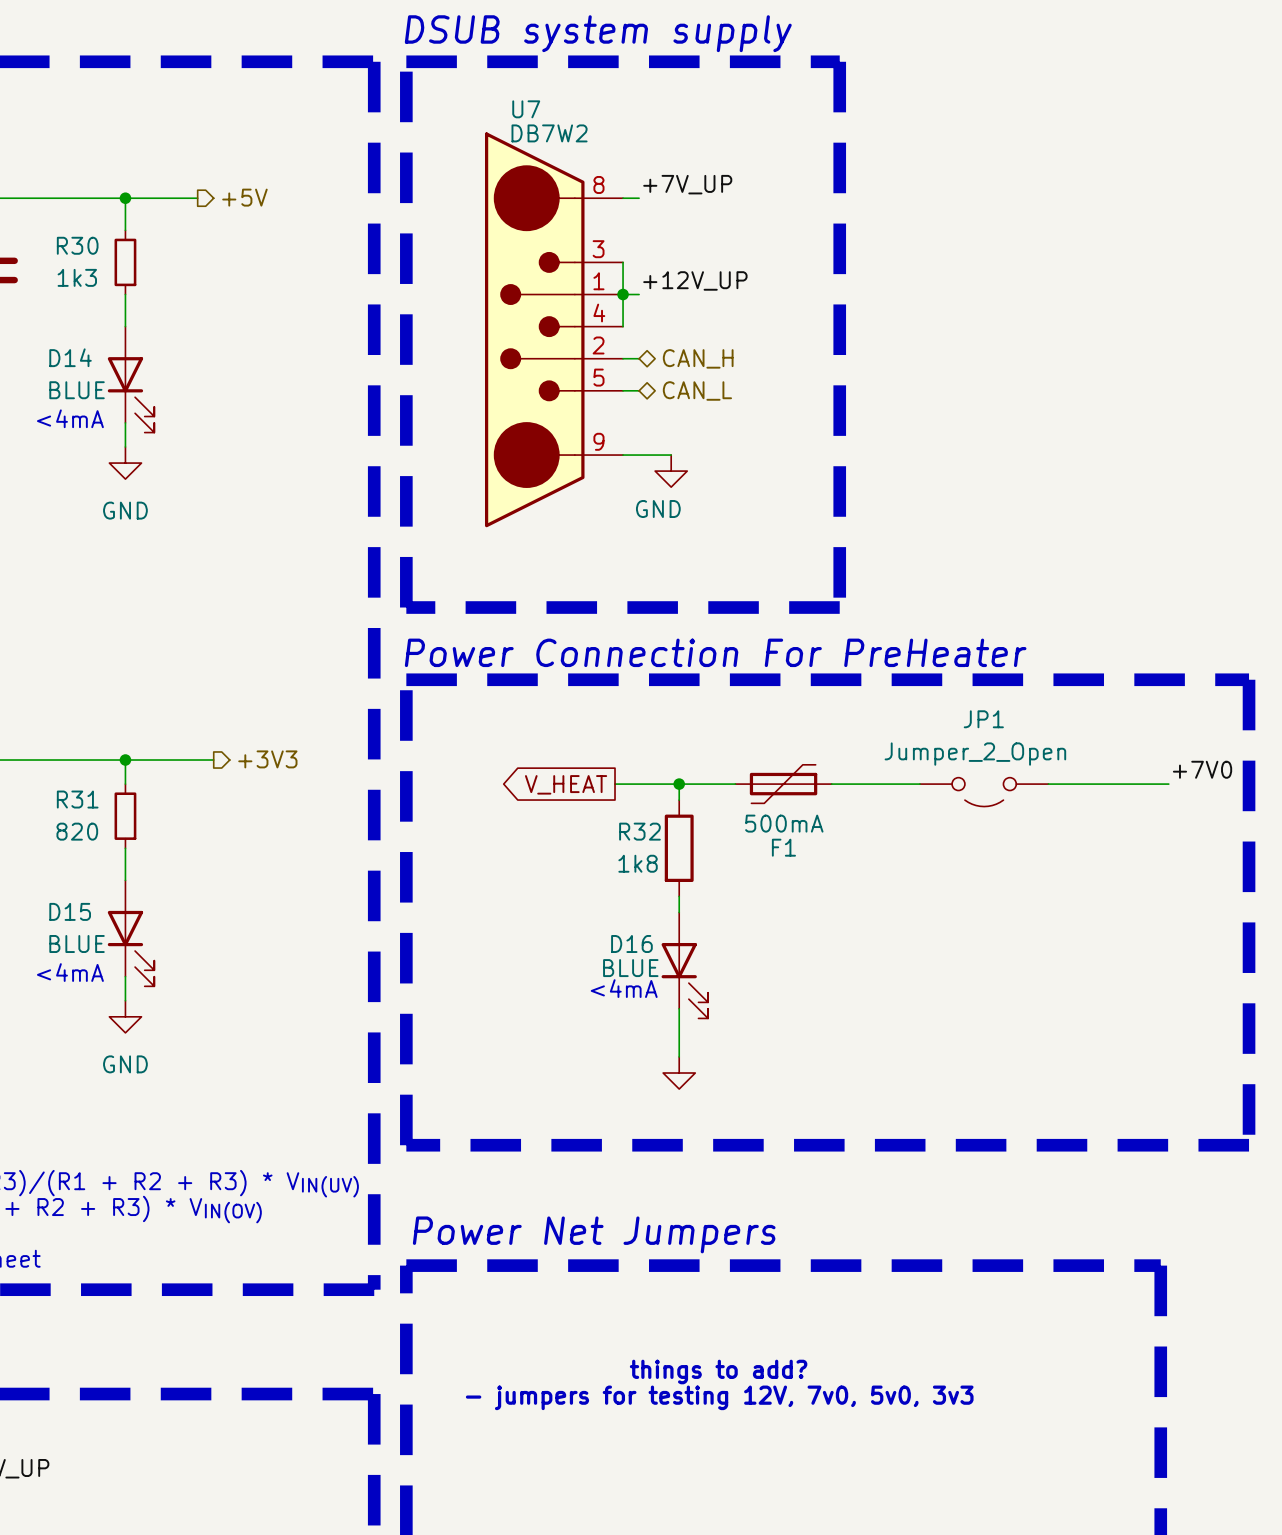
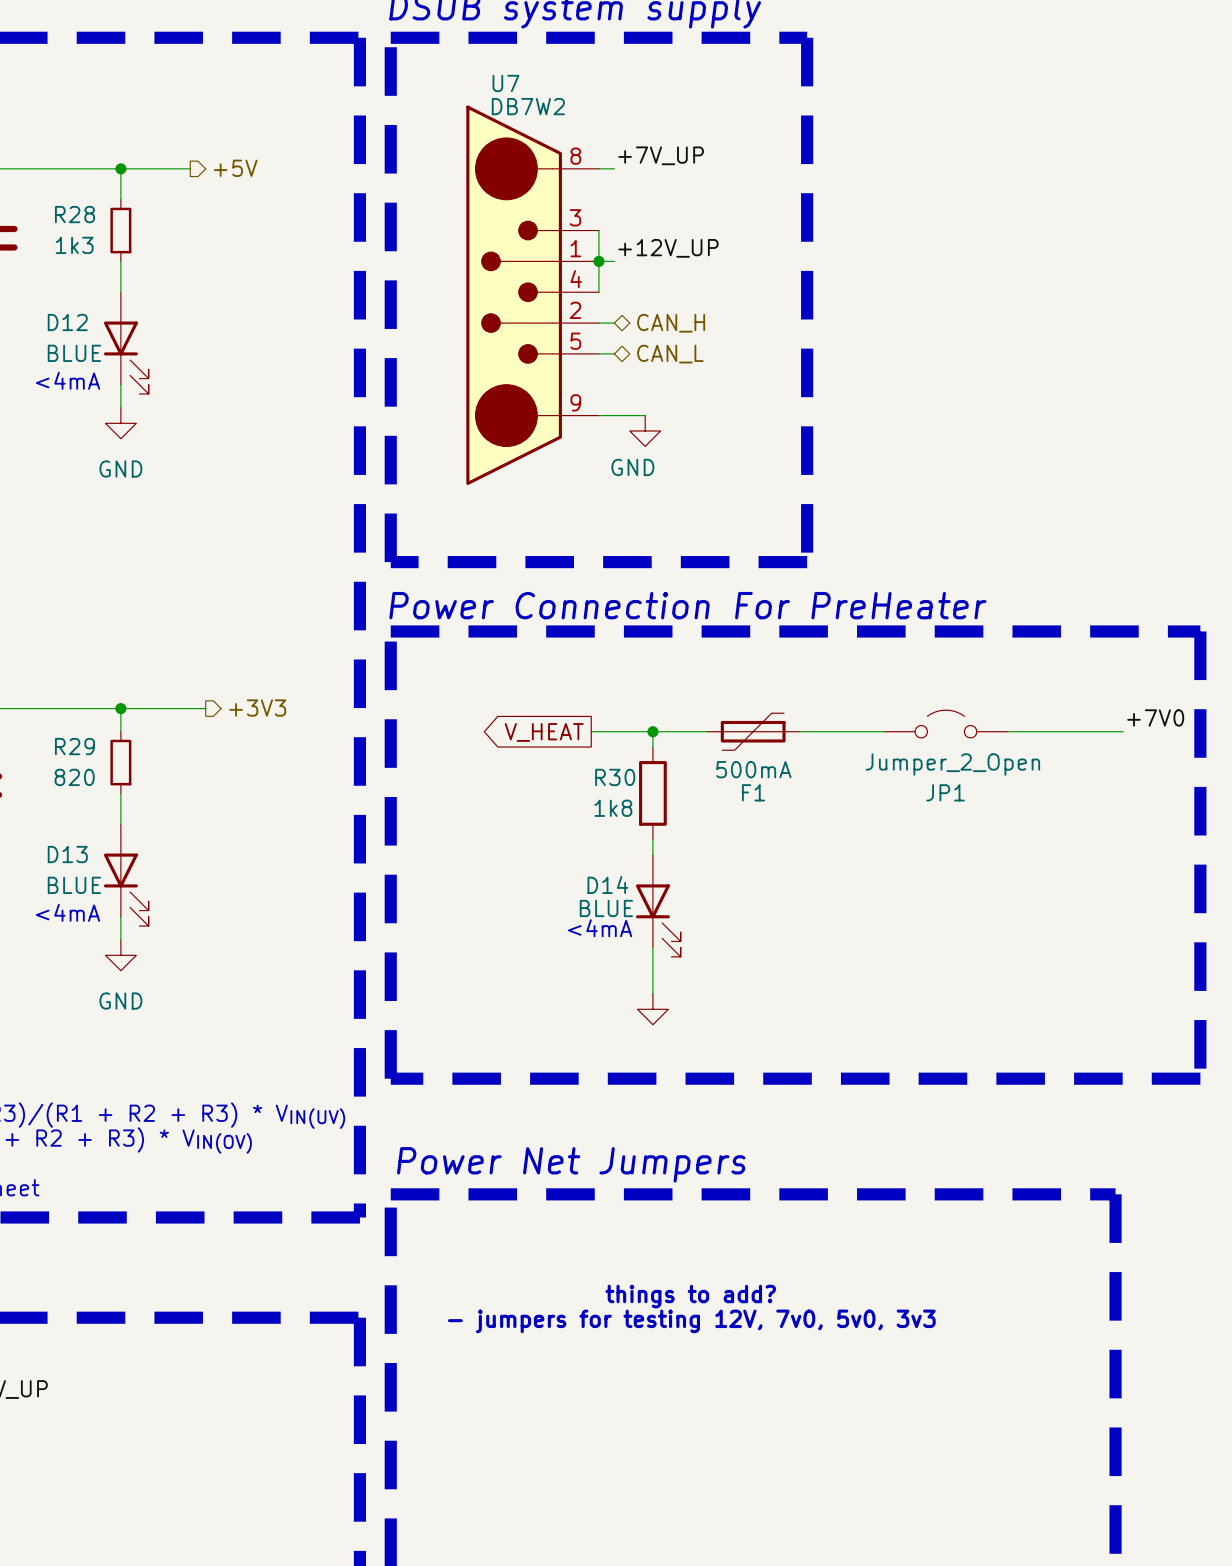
R30 name: R30 (77, 245) -> R28 (75, 214)
D14 name: D14 (70, 357) -> D12 (67, 322)
JP1 rotation: 0° (984, 792) -> 180° (945, 724)
R31 name: R31 (77, 799) -> R29 (75, 746)
R32 name: R32 (639, 831) -> R30 (615, 777)
D15 name: D15 (70, 911) -> D13 (67, 854)
D16 name: D16 (631, 943) -> D14 (607, 884)

